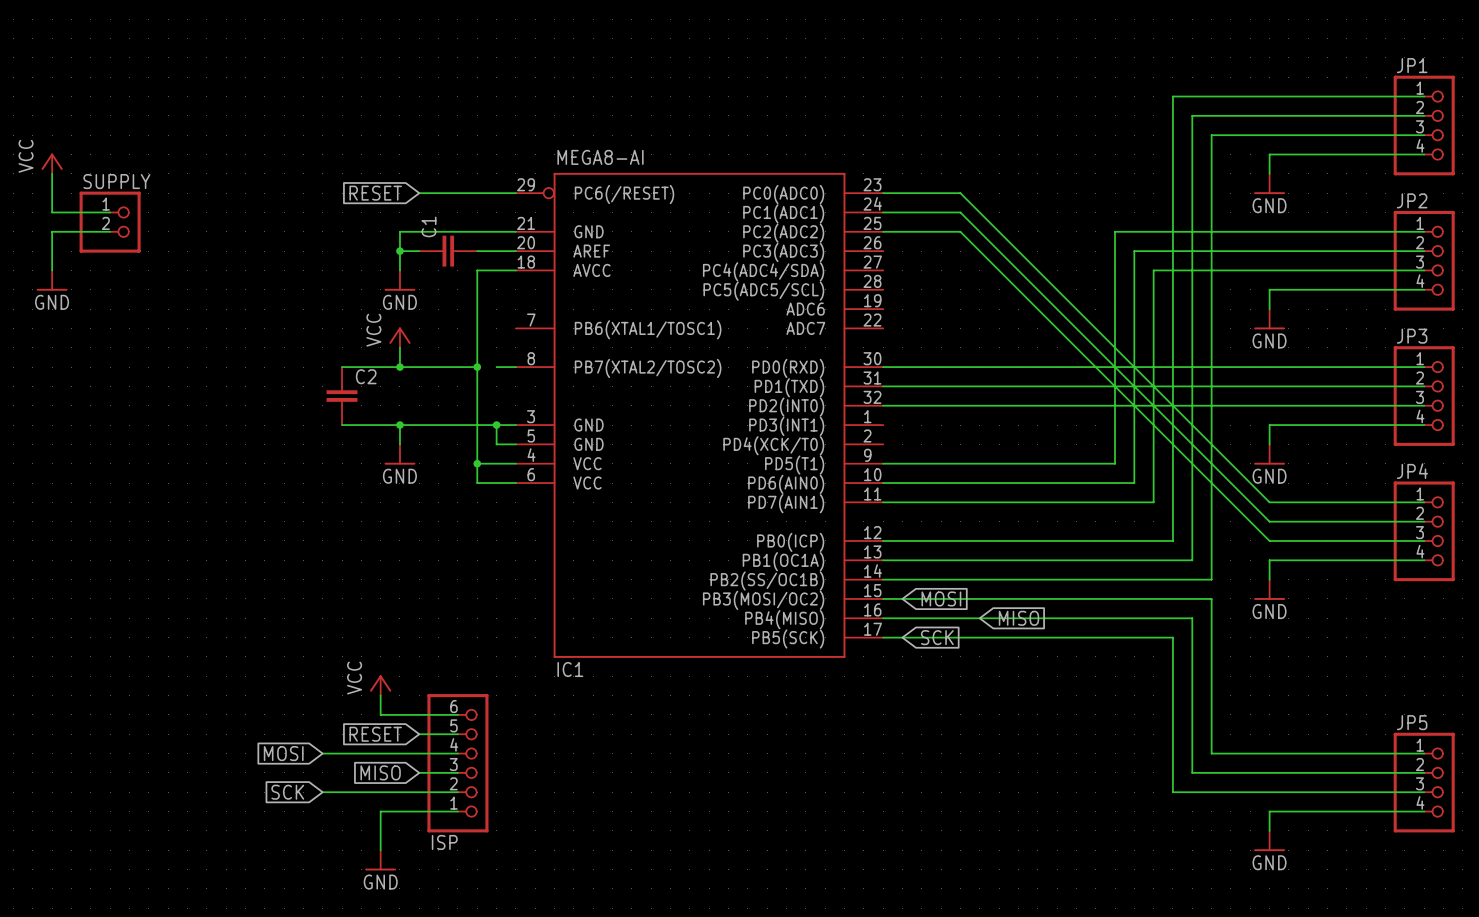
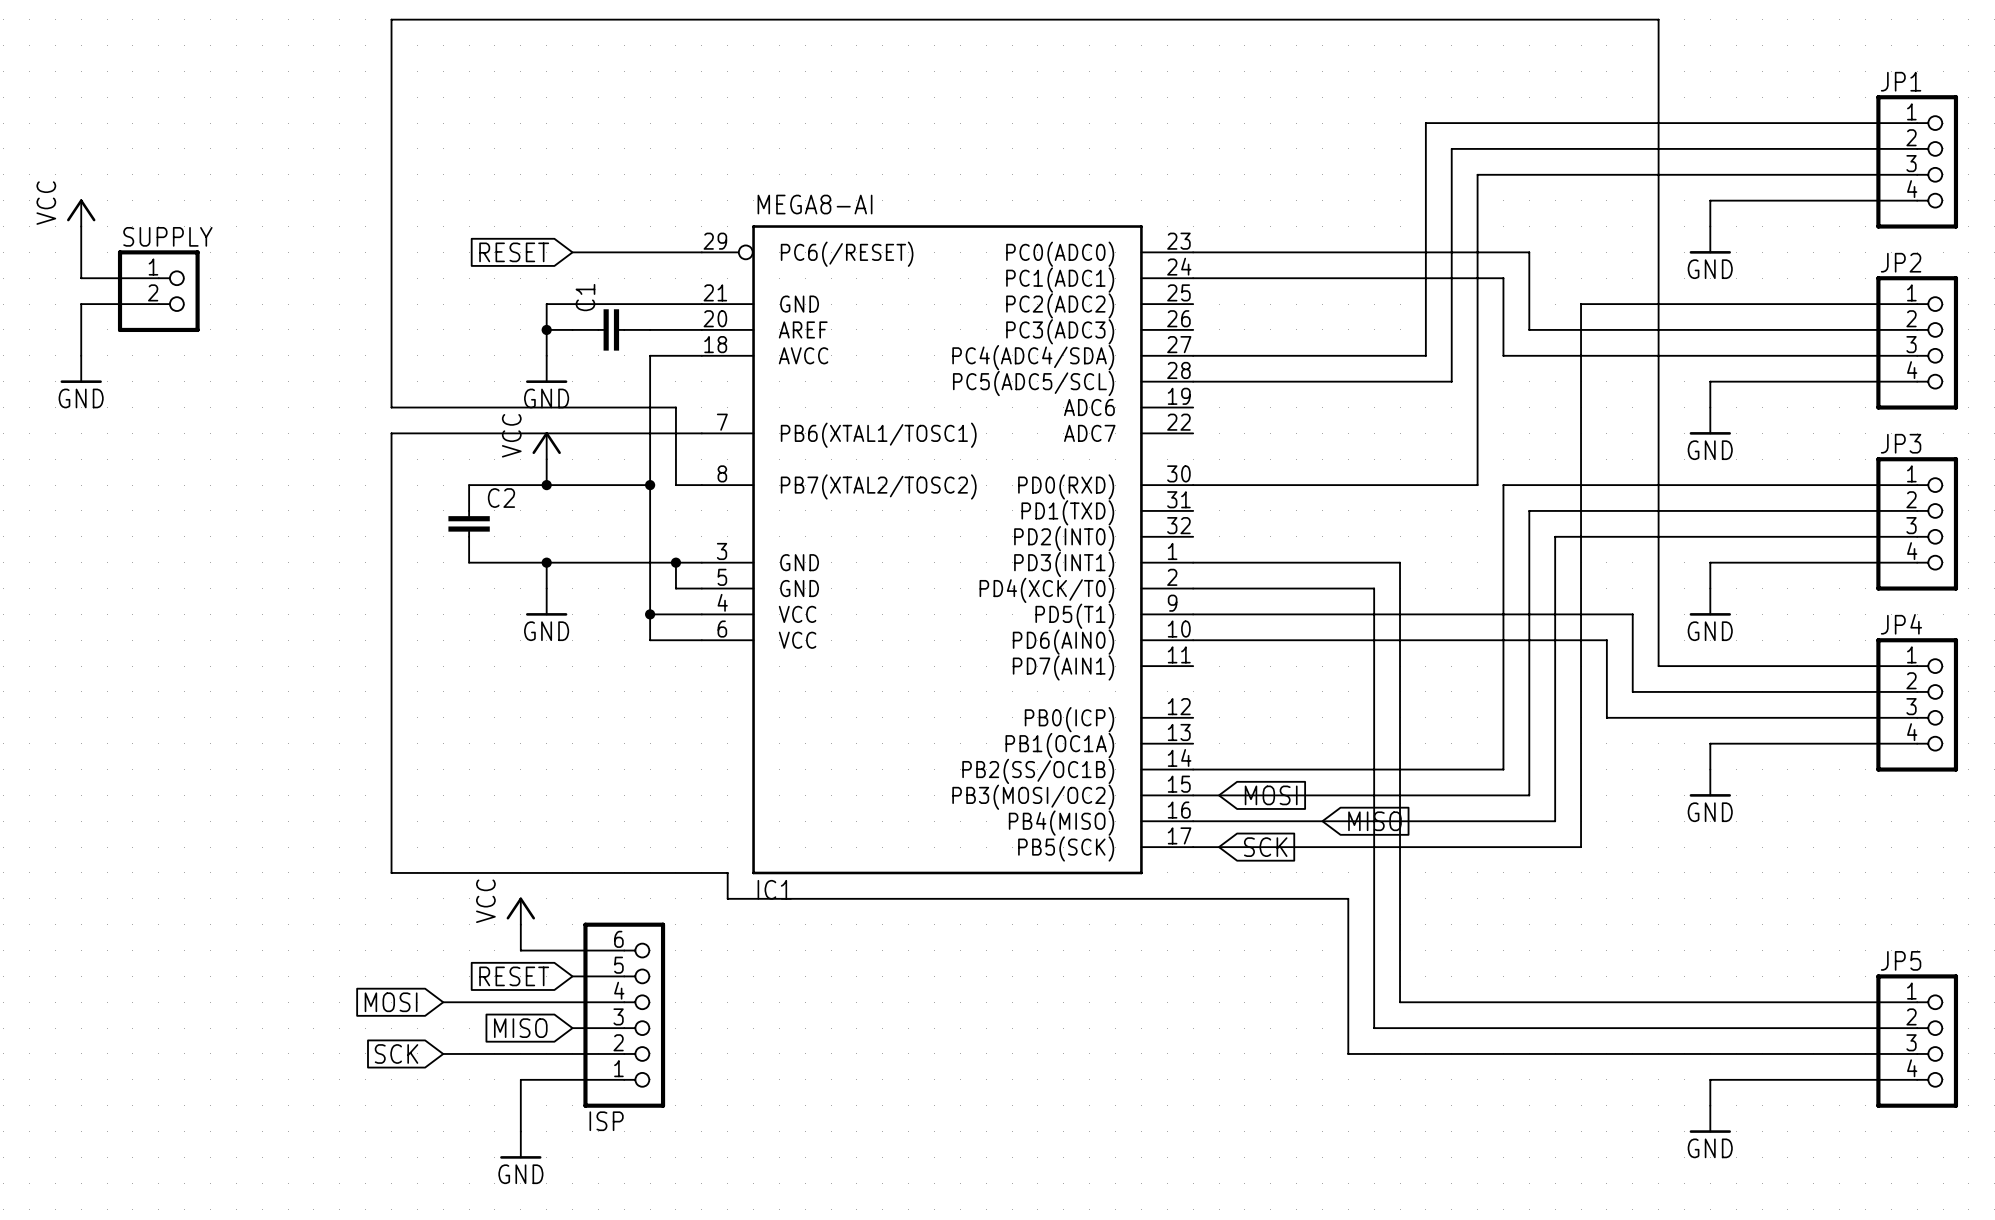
wire: (1172, 96) (1172, 231) (1115, 231) -> (1581, 123) (1425, 123) (1425, 355) (1193, 355)
wire: (1192, 115) (1192, 483) -> (1606, 148) (1451, 148) (1451, 381) (1193, 381)
wire: (1211, 135) (1211, 463) -> (1632, 174) (1477, 174) (1477, 485)
wire: (960, 193) (1269, 502) -> (675, 485) (675, 407) (391, 407) (391, 19) (1658, 19) (1658, 666) (1710, 666)
wire: (960, 212) (1269, 521) -> (1296, 278) (1503, 278) (1503, 304)
wire: (883, 231) (960, 231) (1269, 540) -> none
wire: (1134, 251) (1134, 386) (883, 386) -> (1529, 329) (1529, 252) (1296, 252)
wire: (1115, 270) (1115, 367) (1095, 367) -> (1503, 355) (1555, 355)
wire: (1153, 270) (1153, 405) (883, 405) -> none
wire: none -> (701, 433) (391, 433) (391, 872) (727, 872) (727, 898) (1348, 898) (1348, 1053) (1581, 1053)
wire: none -> (1193, 562) (1400, 562) (1400, 1002) (1632, 1002)
wire: none -> (1193, 588) (1374, 588) (1374, 1028) (1606, 1028)
wire: (883, 502) (1153, 502) -> none
wire: (1211, 521) (1211, 579) (1115, 579) -> (1632, 614) (1503, 614) (1503, 769)
wire: none -> (1632, 691) (1710, 691)
wire: (883, 540) (1172, 540) -> none
wire: (1192, 540) (1192, 560) (883, 560) -> (1606, 717) (1710, 717)
wire: (1134, 598) (1211, 598) (1211, 753) -> (1529, 795) (1529, 640) (1606, 640)
wire: (1153, 618) (1192, 618) (1192, 772) -> (1555, 821) (1555, 666)
wire: (1172, 637) (1172, 792) -> (1581, 847) (1581, 717)

